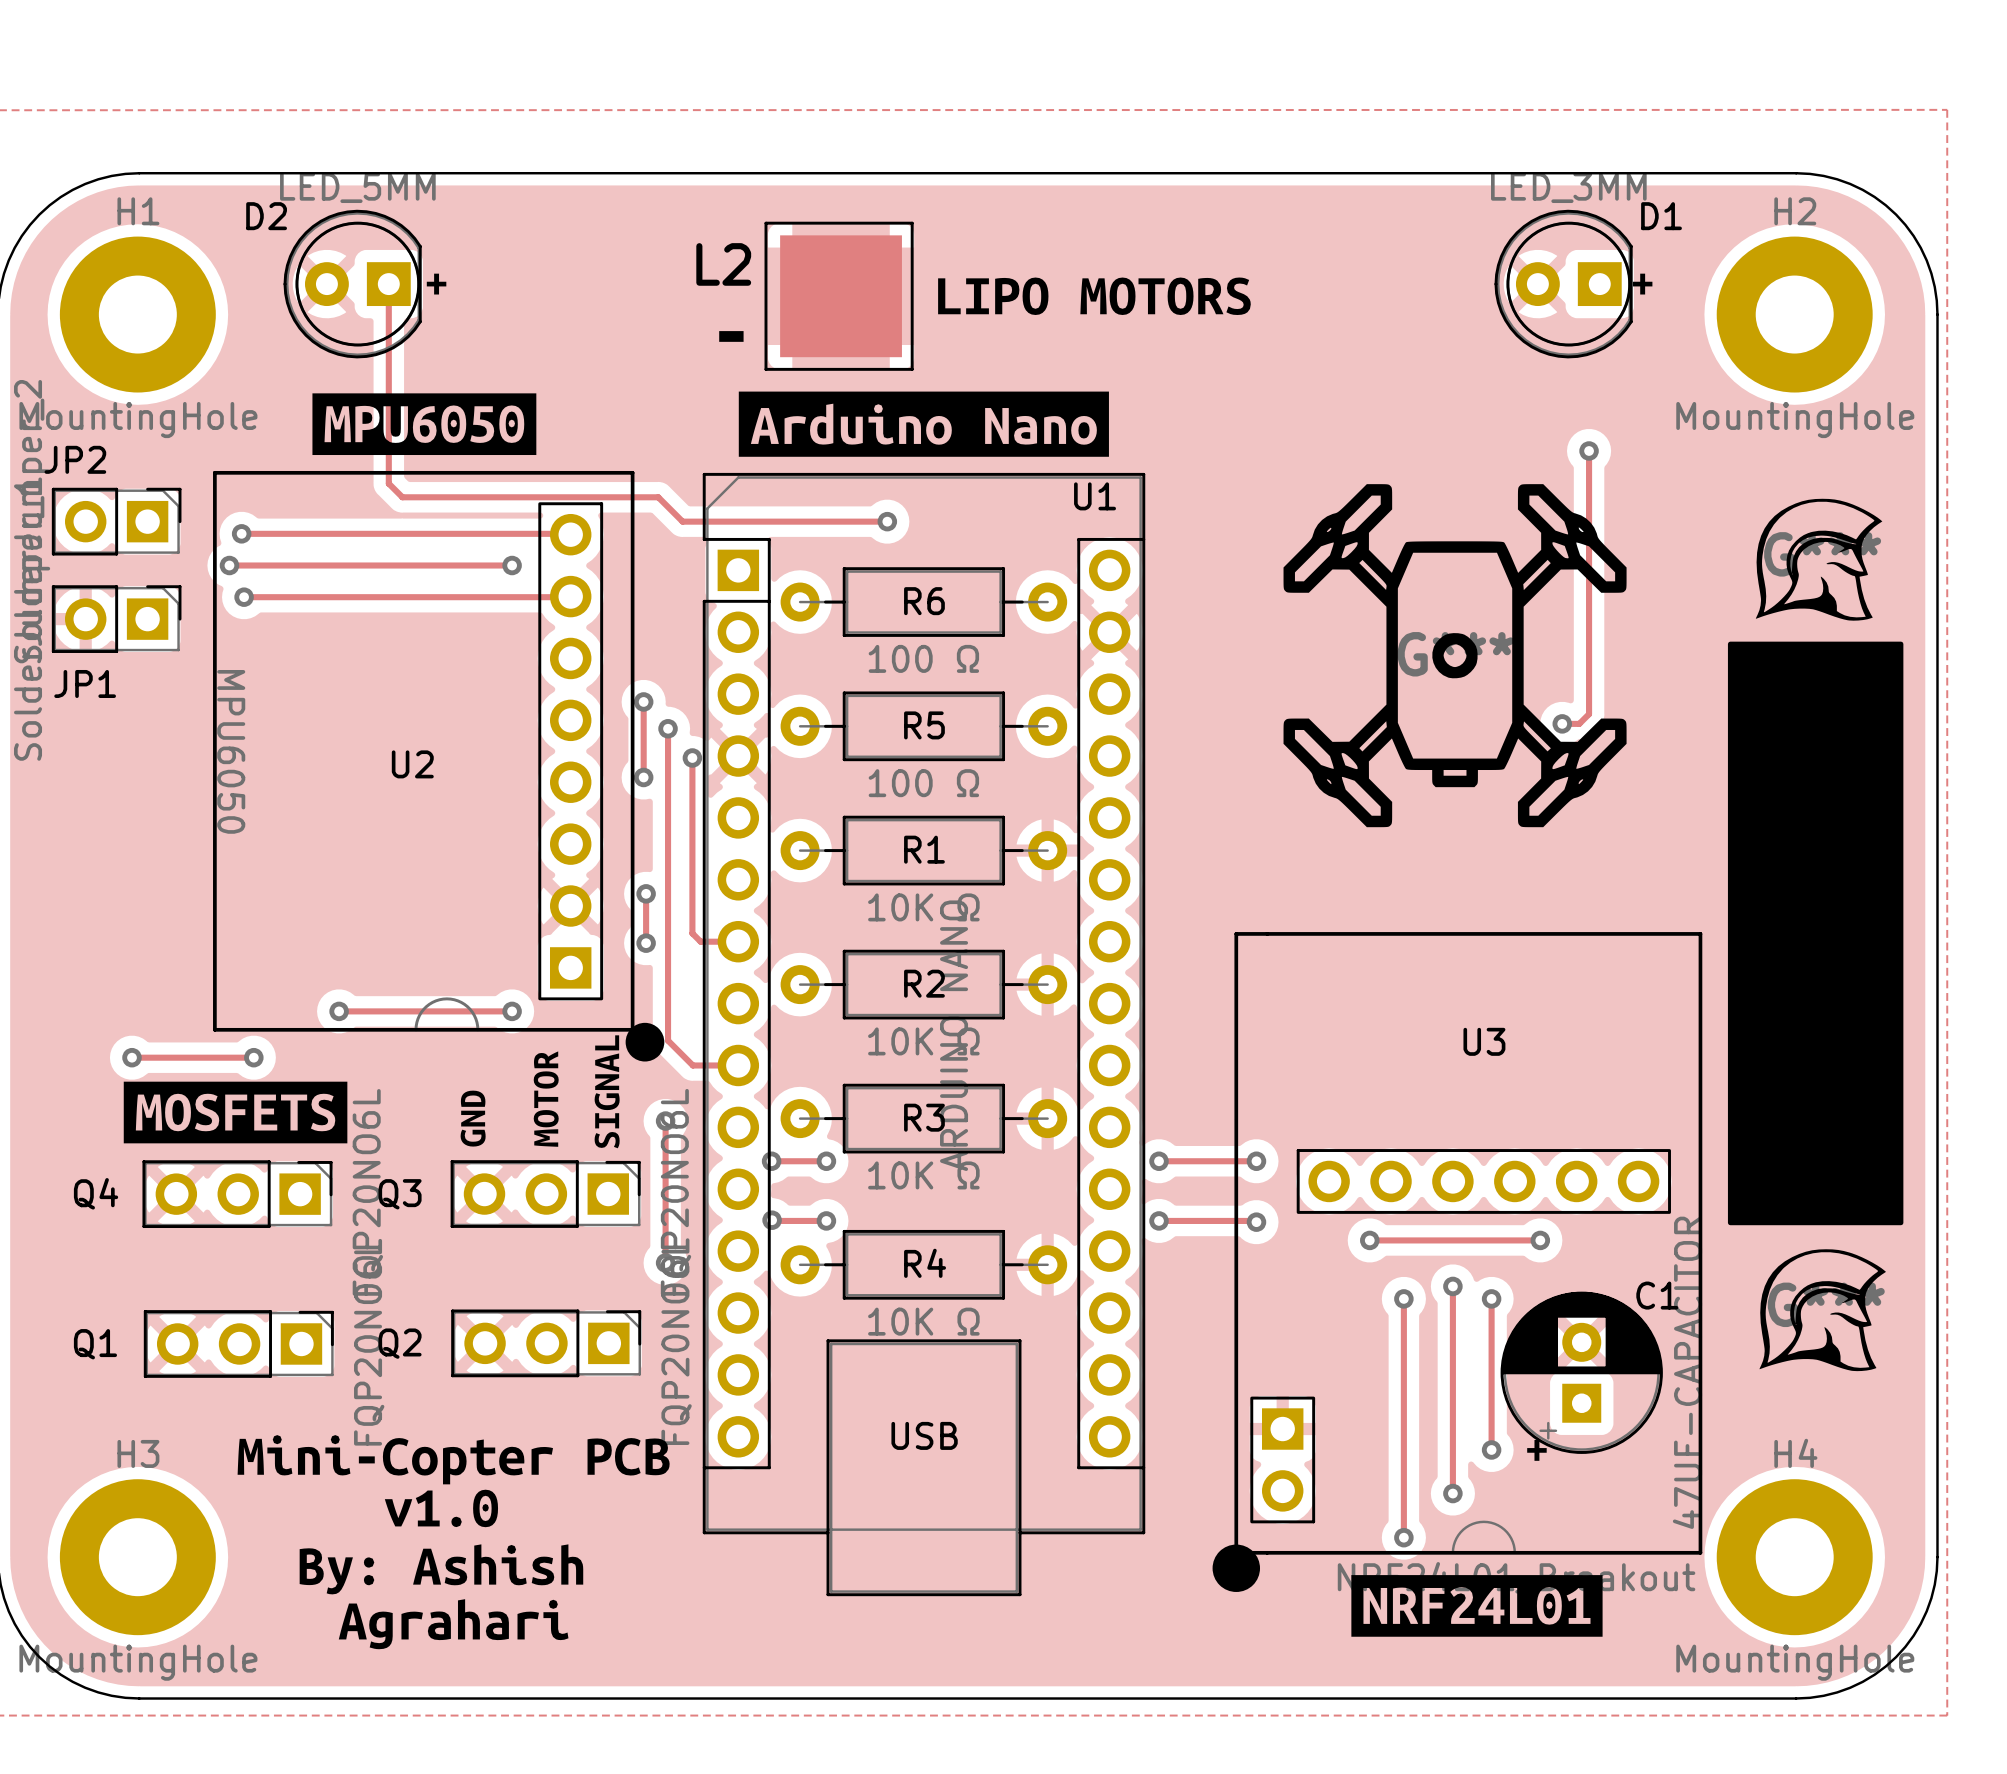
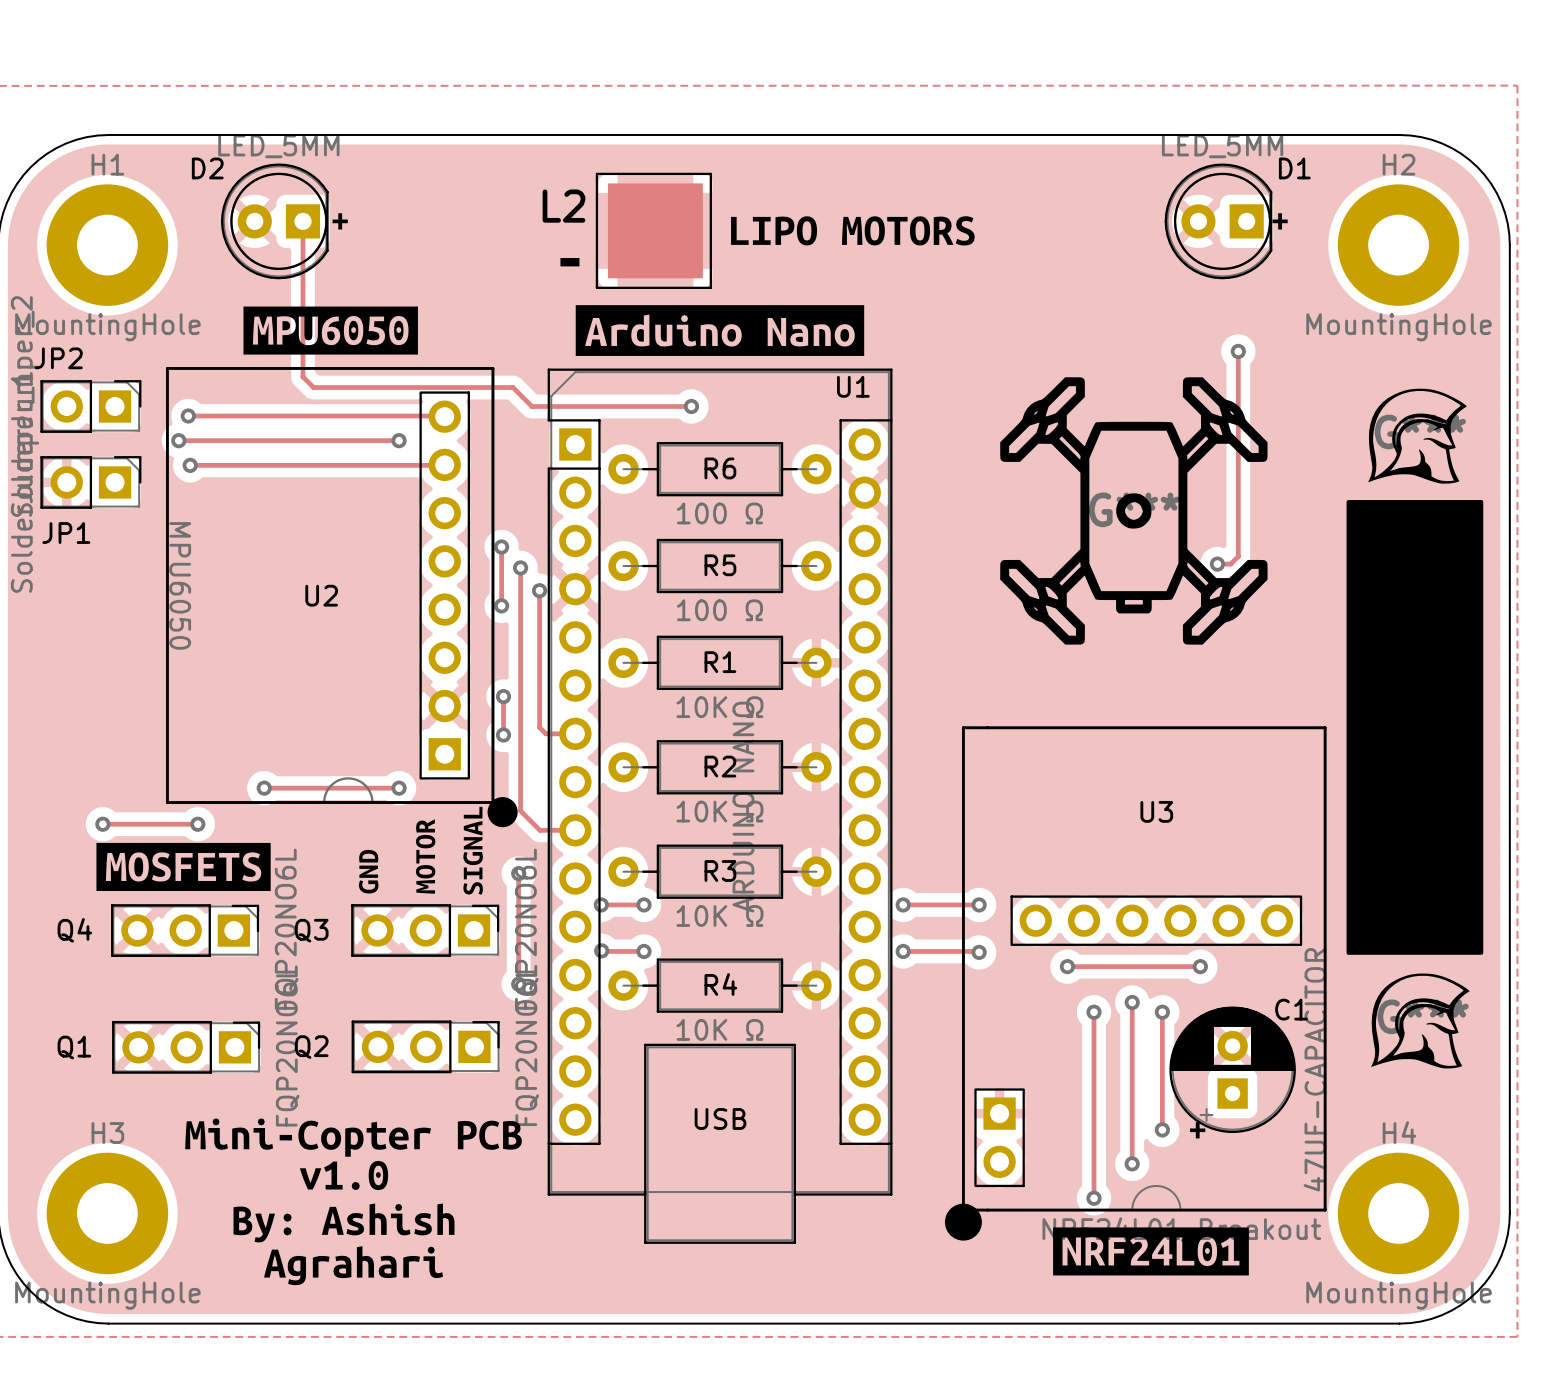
D1 value: LED_3MM (1568, 187) -> LED_5MM (1222, 146)

